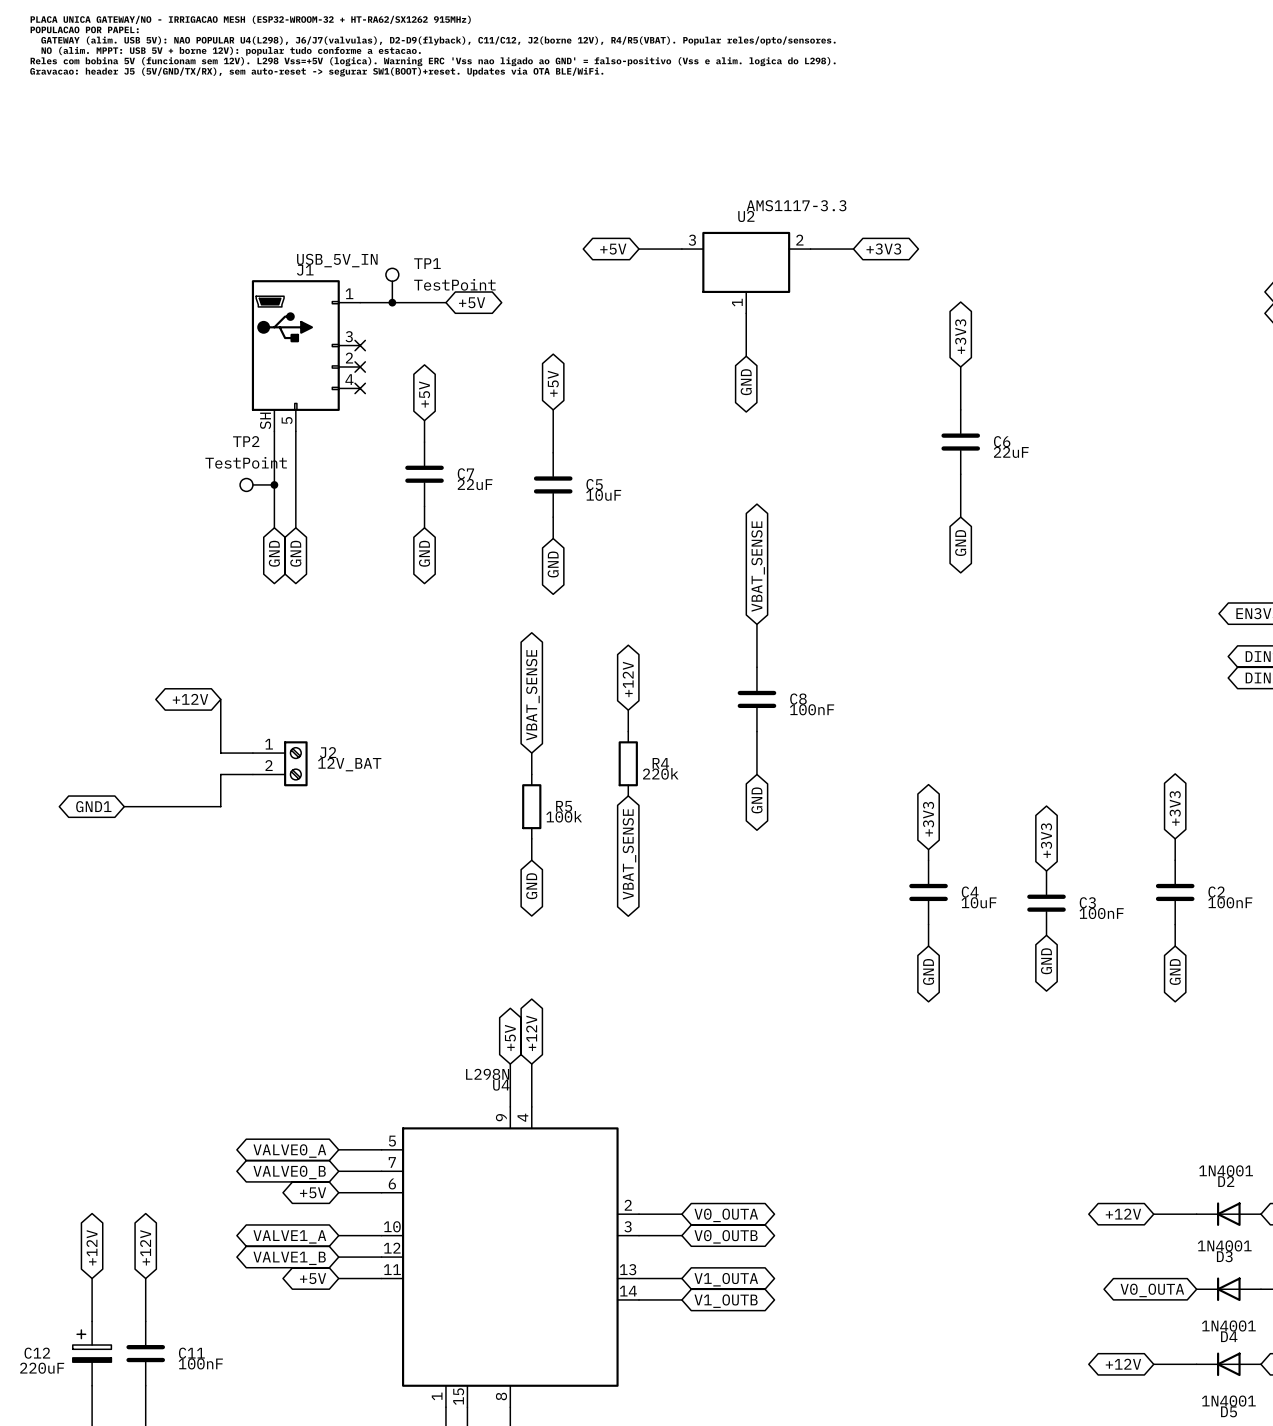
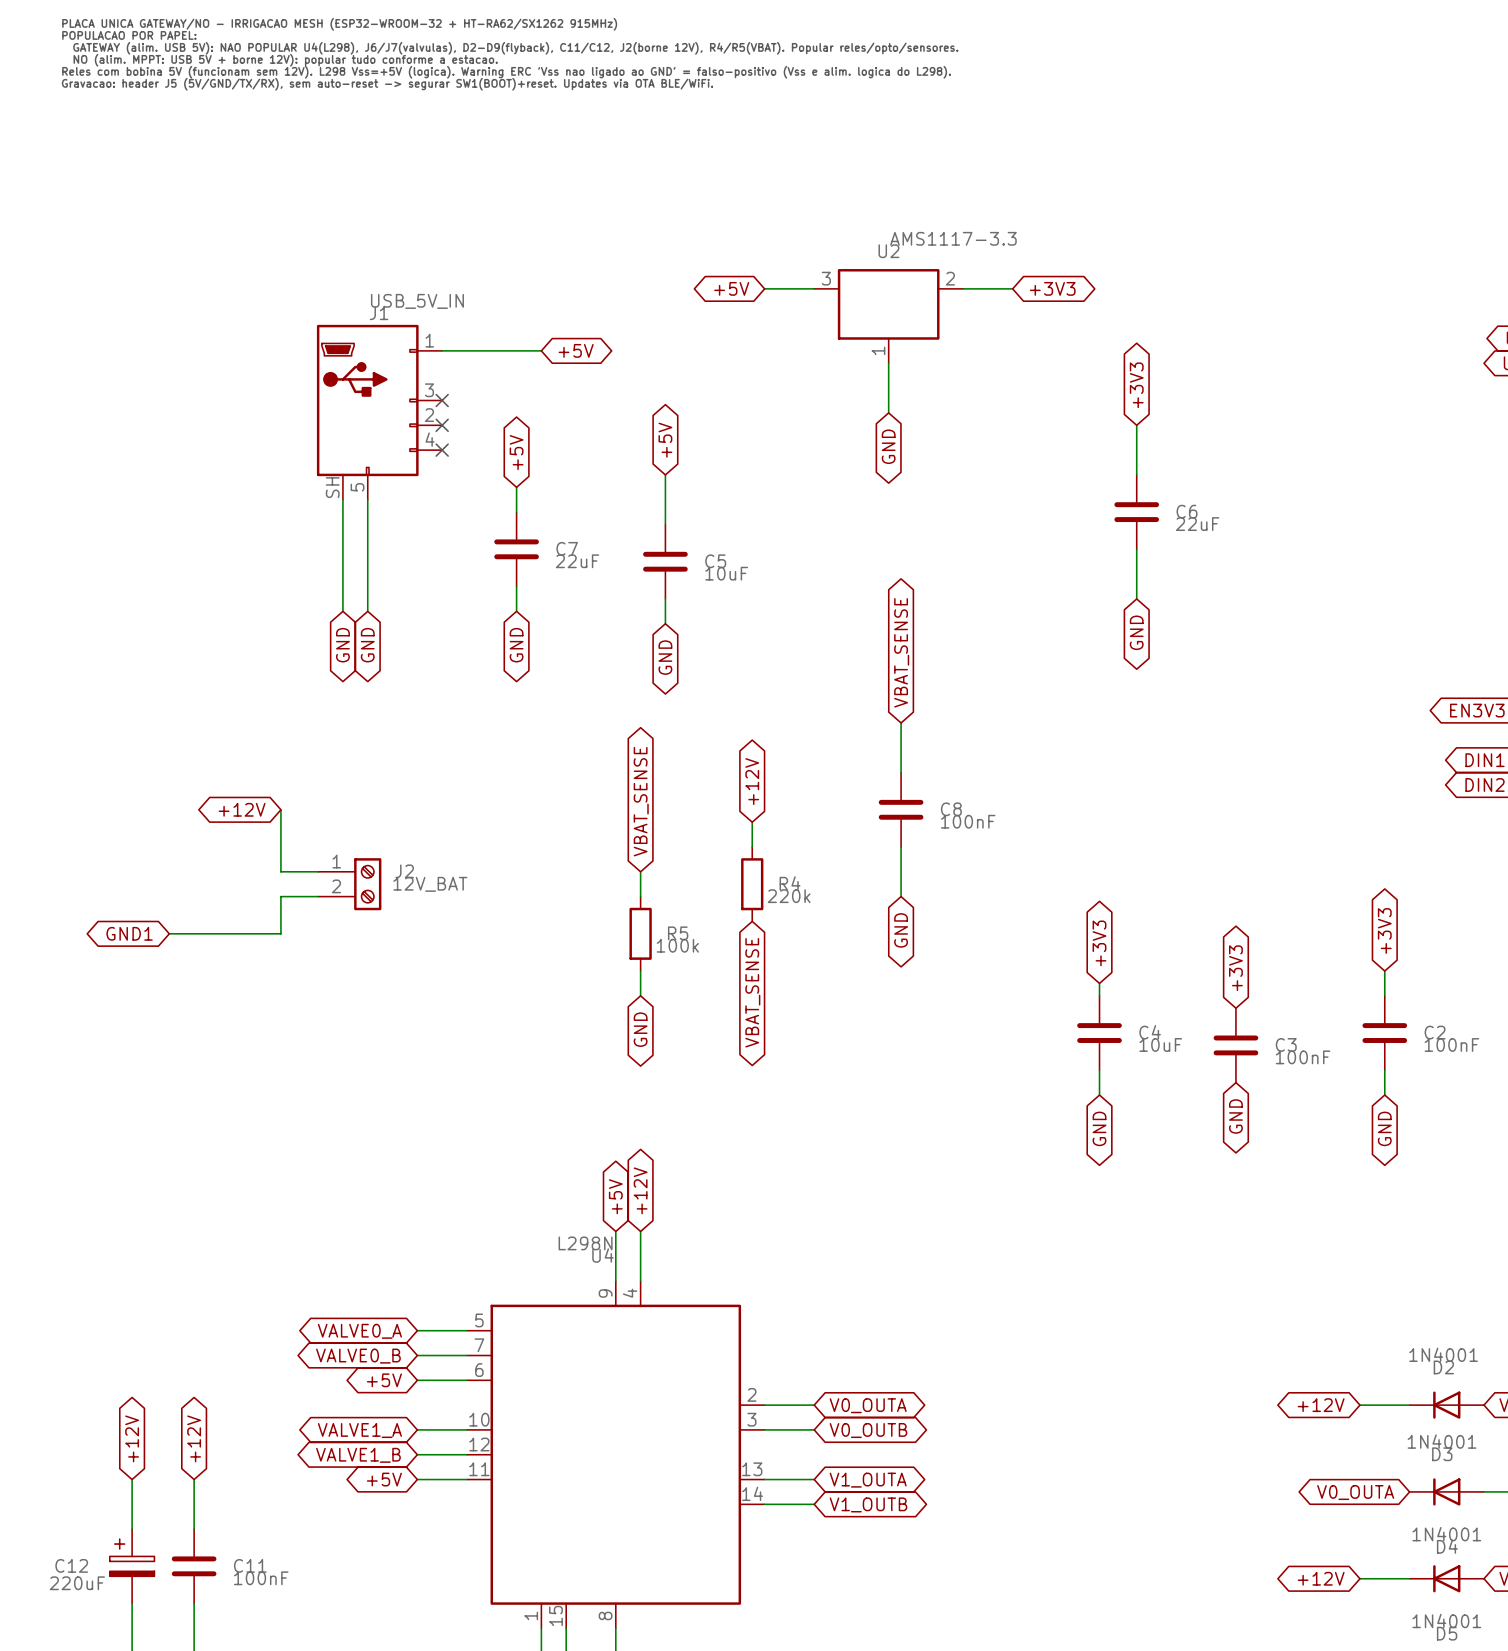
TP1: TestPoint (392, 285) -> none
junction: (392, 302) -> none
TP2: TestPoint (257, 484) -> none
junction: (274, 484) -> none

